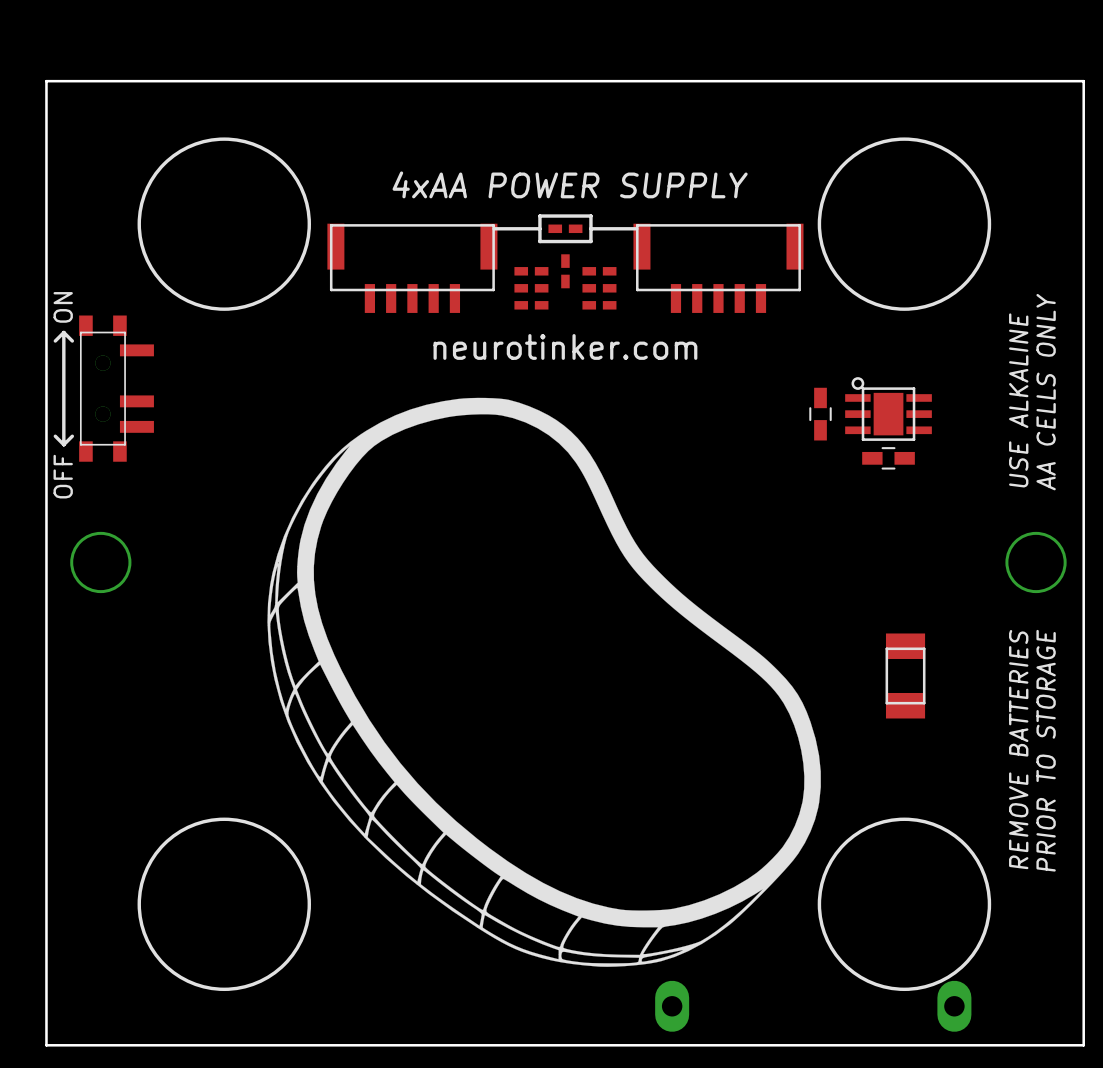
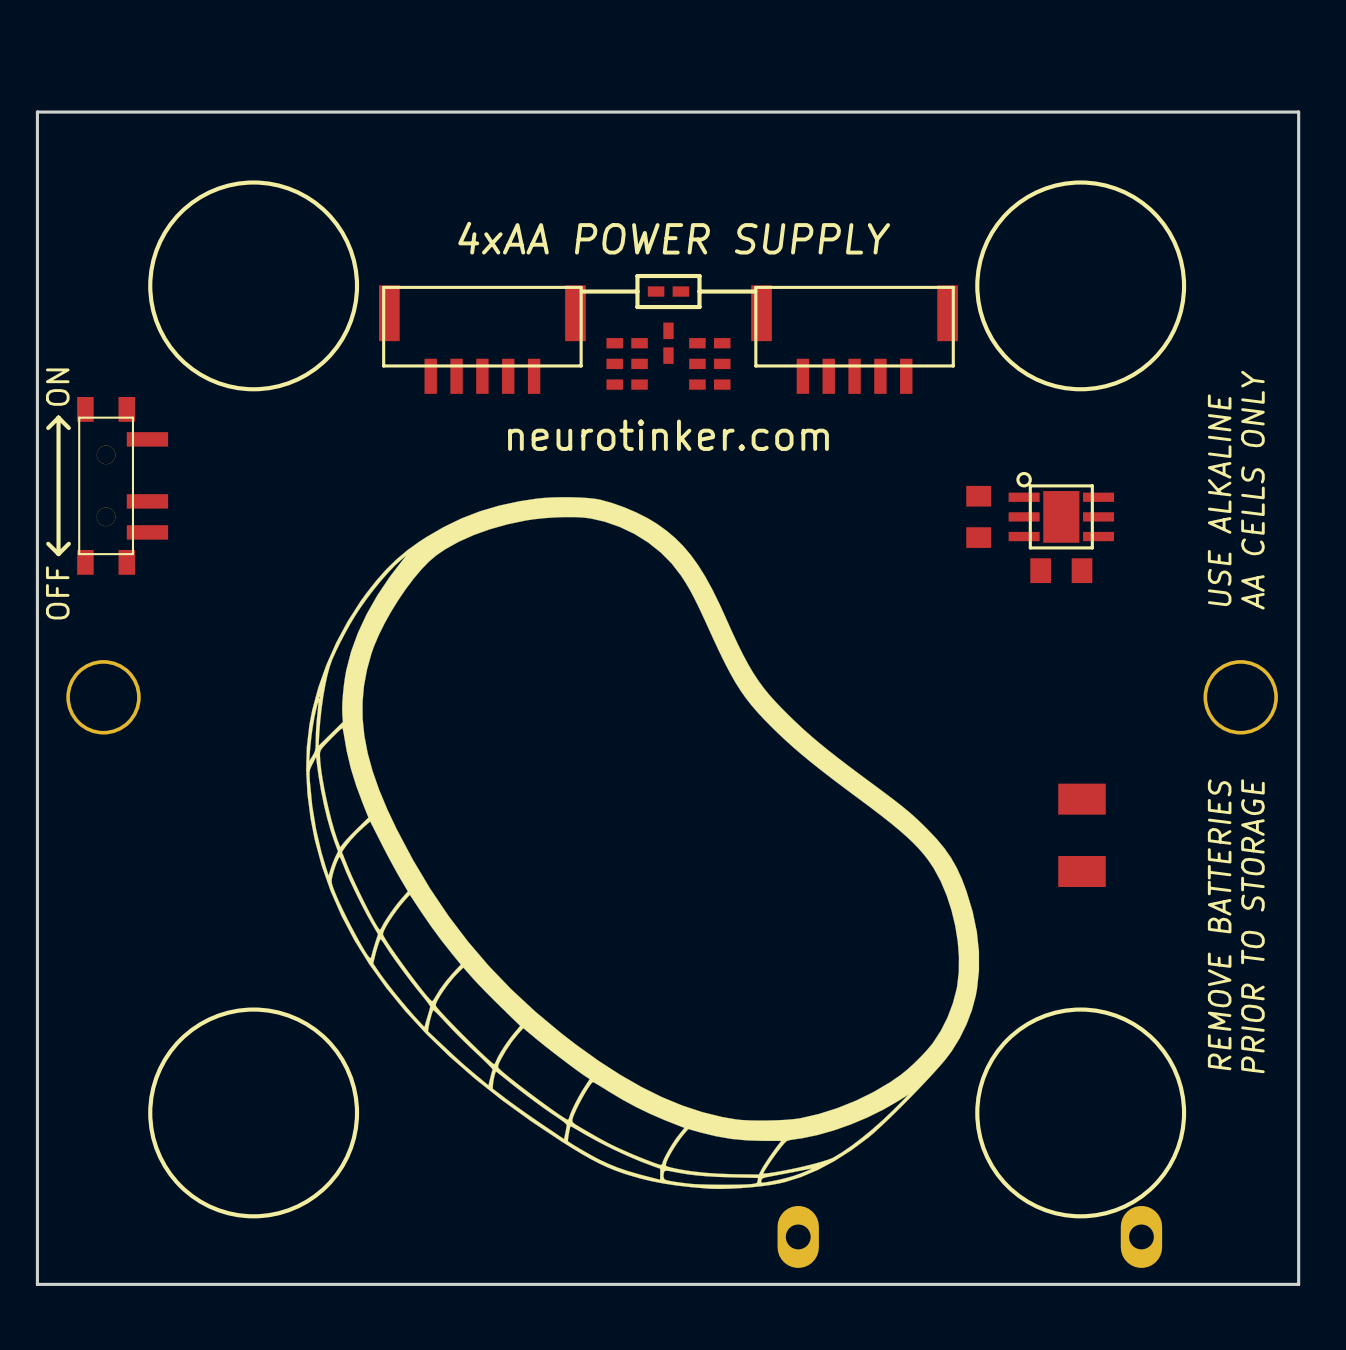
part footprint: [809, 387, 832, 441] -> [966, 485, 992, 548]
part footprint: [862, 447, 915, 470] -> [1030, 558, 1093, 584]
part footprint: [885, 633, 926, 719] -> [1058, 783, 1106, 888]

